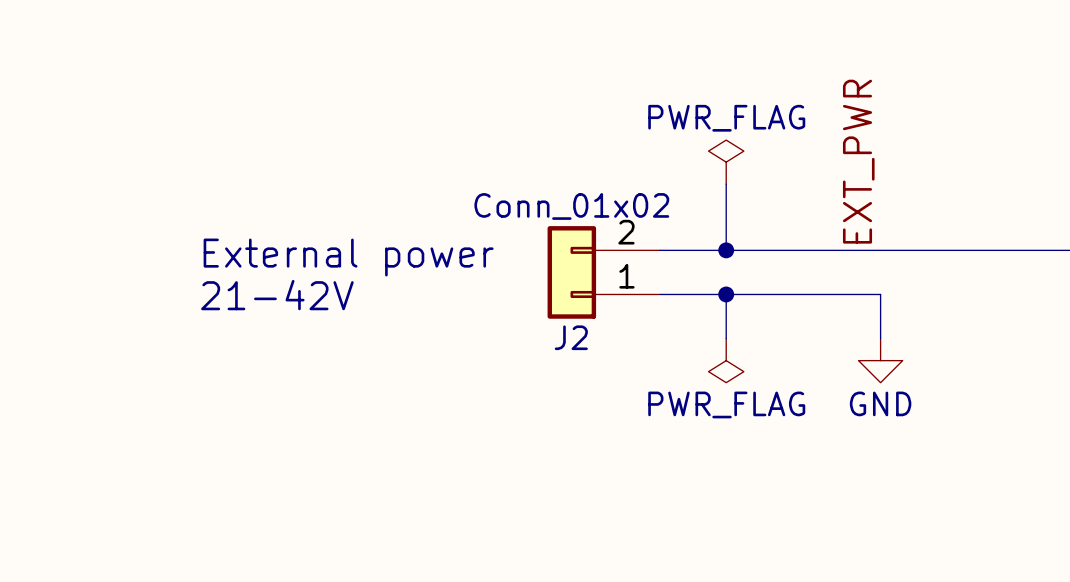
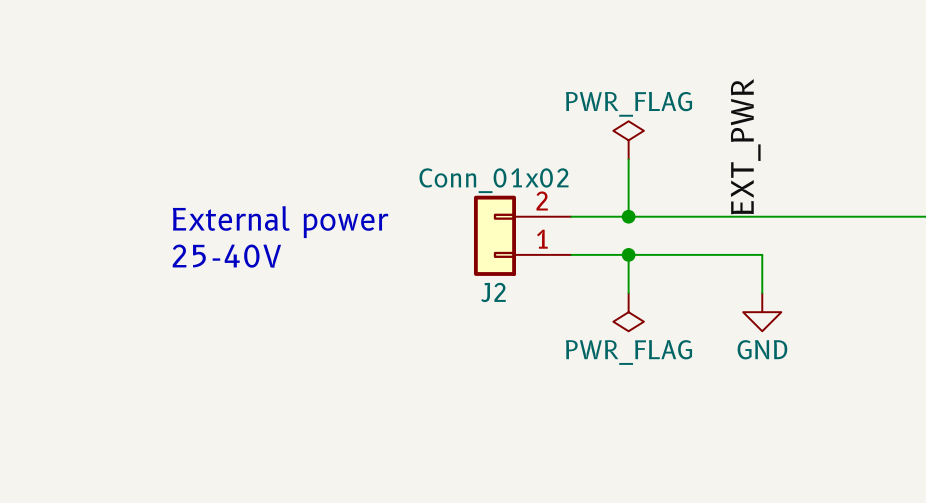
text: 21-42V (277, 295) -> 25-40V (226, 256)

